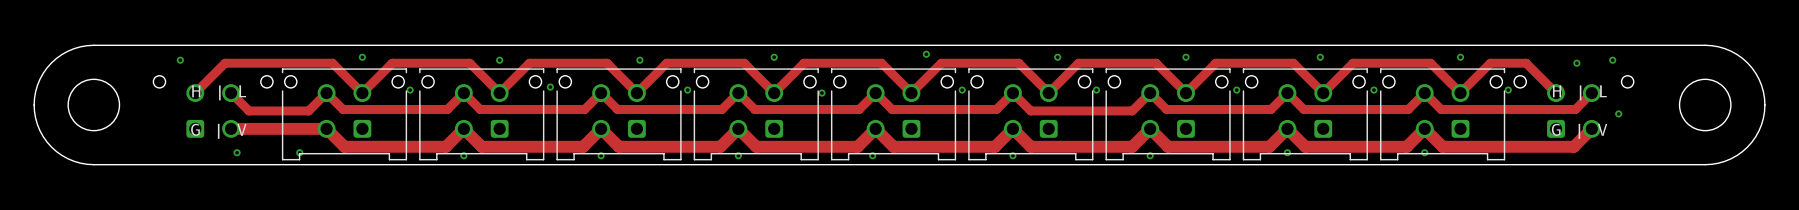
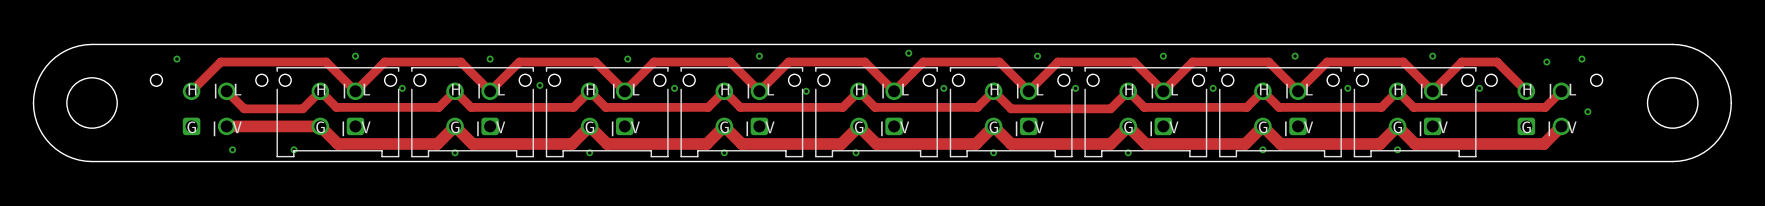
text: none -> H | L (343, 91)
text: none -> H | L (478, 91)
text: none -> H | L (612, 91)
text: none -> H | L (747, 91)
text: none -> H | L (882, 91)
text: none -> H | L (1016, 91)
text: none -> H | L (1151, 91)
text: none -> H | L (1286, 91)
text: none -> H | L (1420, 91)
text: none -> G | V (343, 128)
text: none -> G | V (478, 128)
text: none -> G | V (612, 128)
text: none -> G | V (747, 128)
text: none -> G | V (882, 128)
text: none -> G | V (1016, 128)
text: none -> G | V (1151, 128)
text: none -> G | V (1285, 128)
text: none -> G | V (1420, 128)

